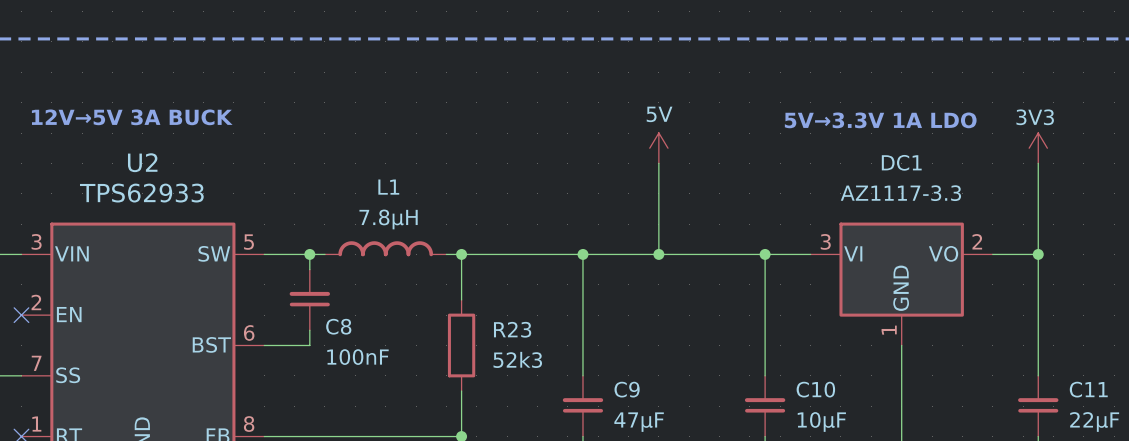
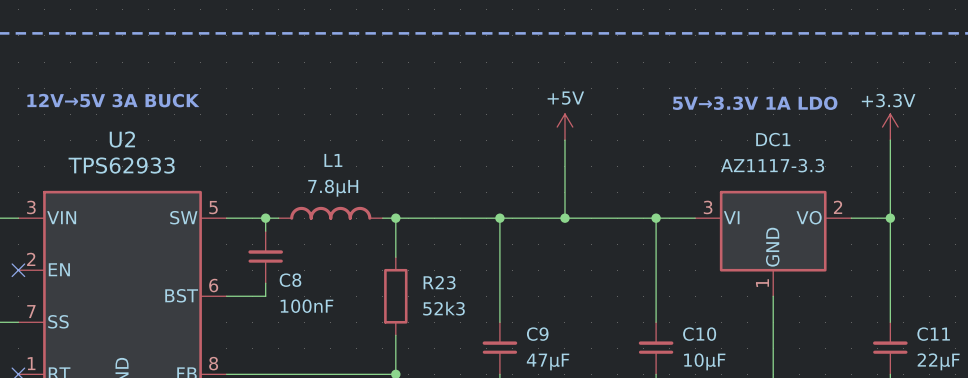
power symbol: 5V (658, 148) -> +5V (564, 127)
power symbol: 3V3 (1038, 148) -> +3.3V (890, 127)

